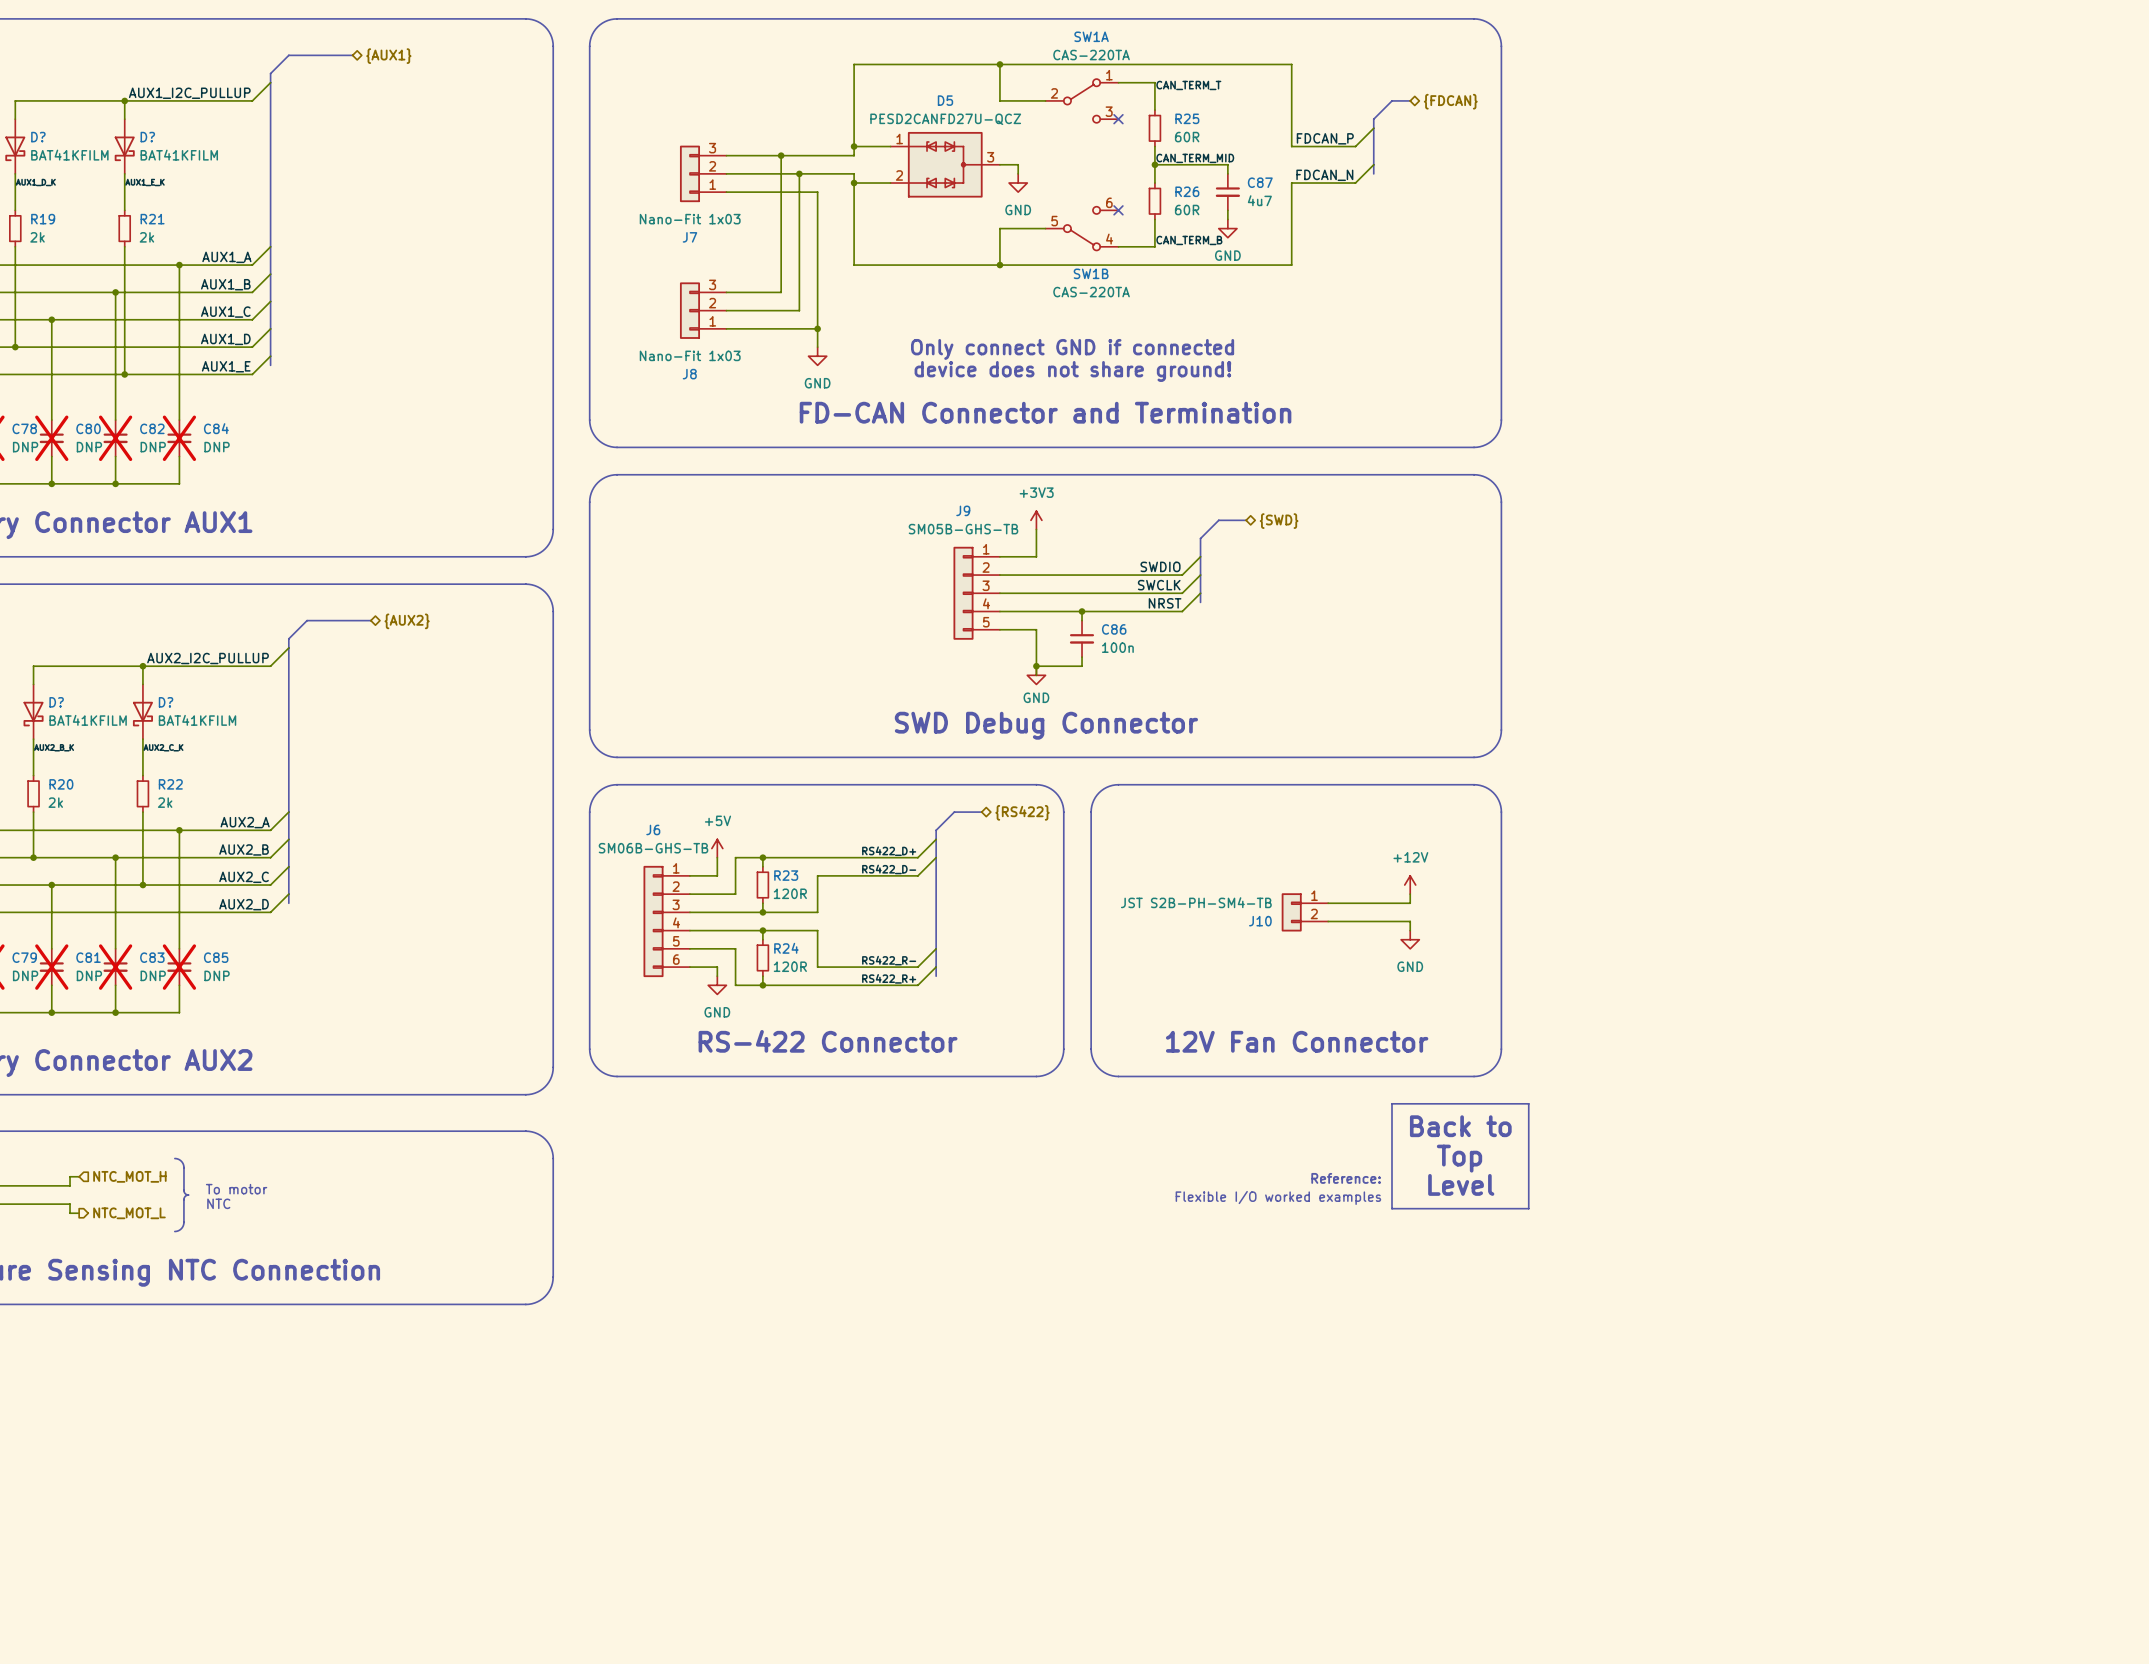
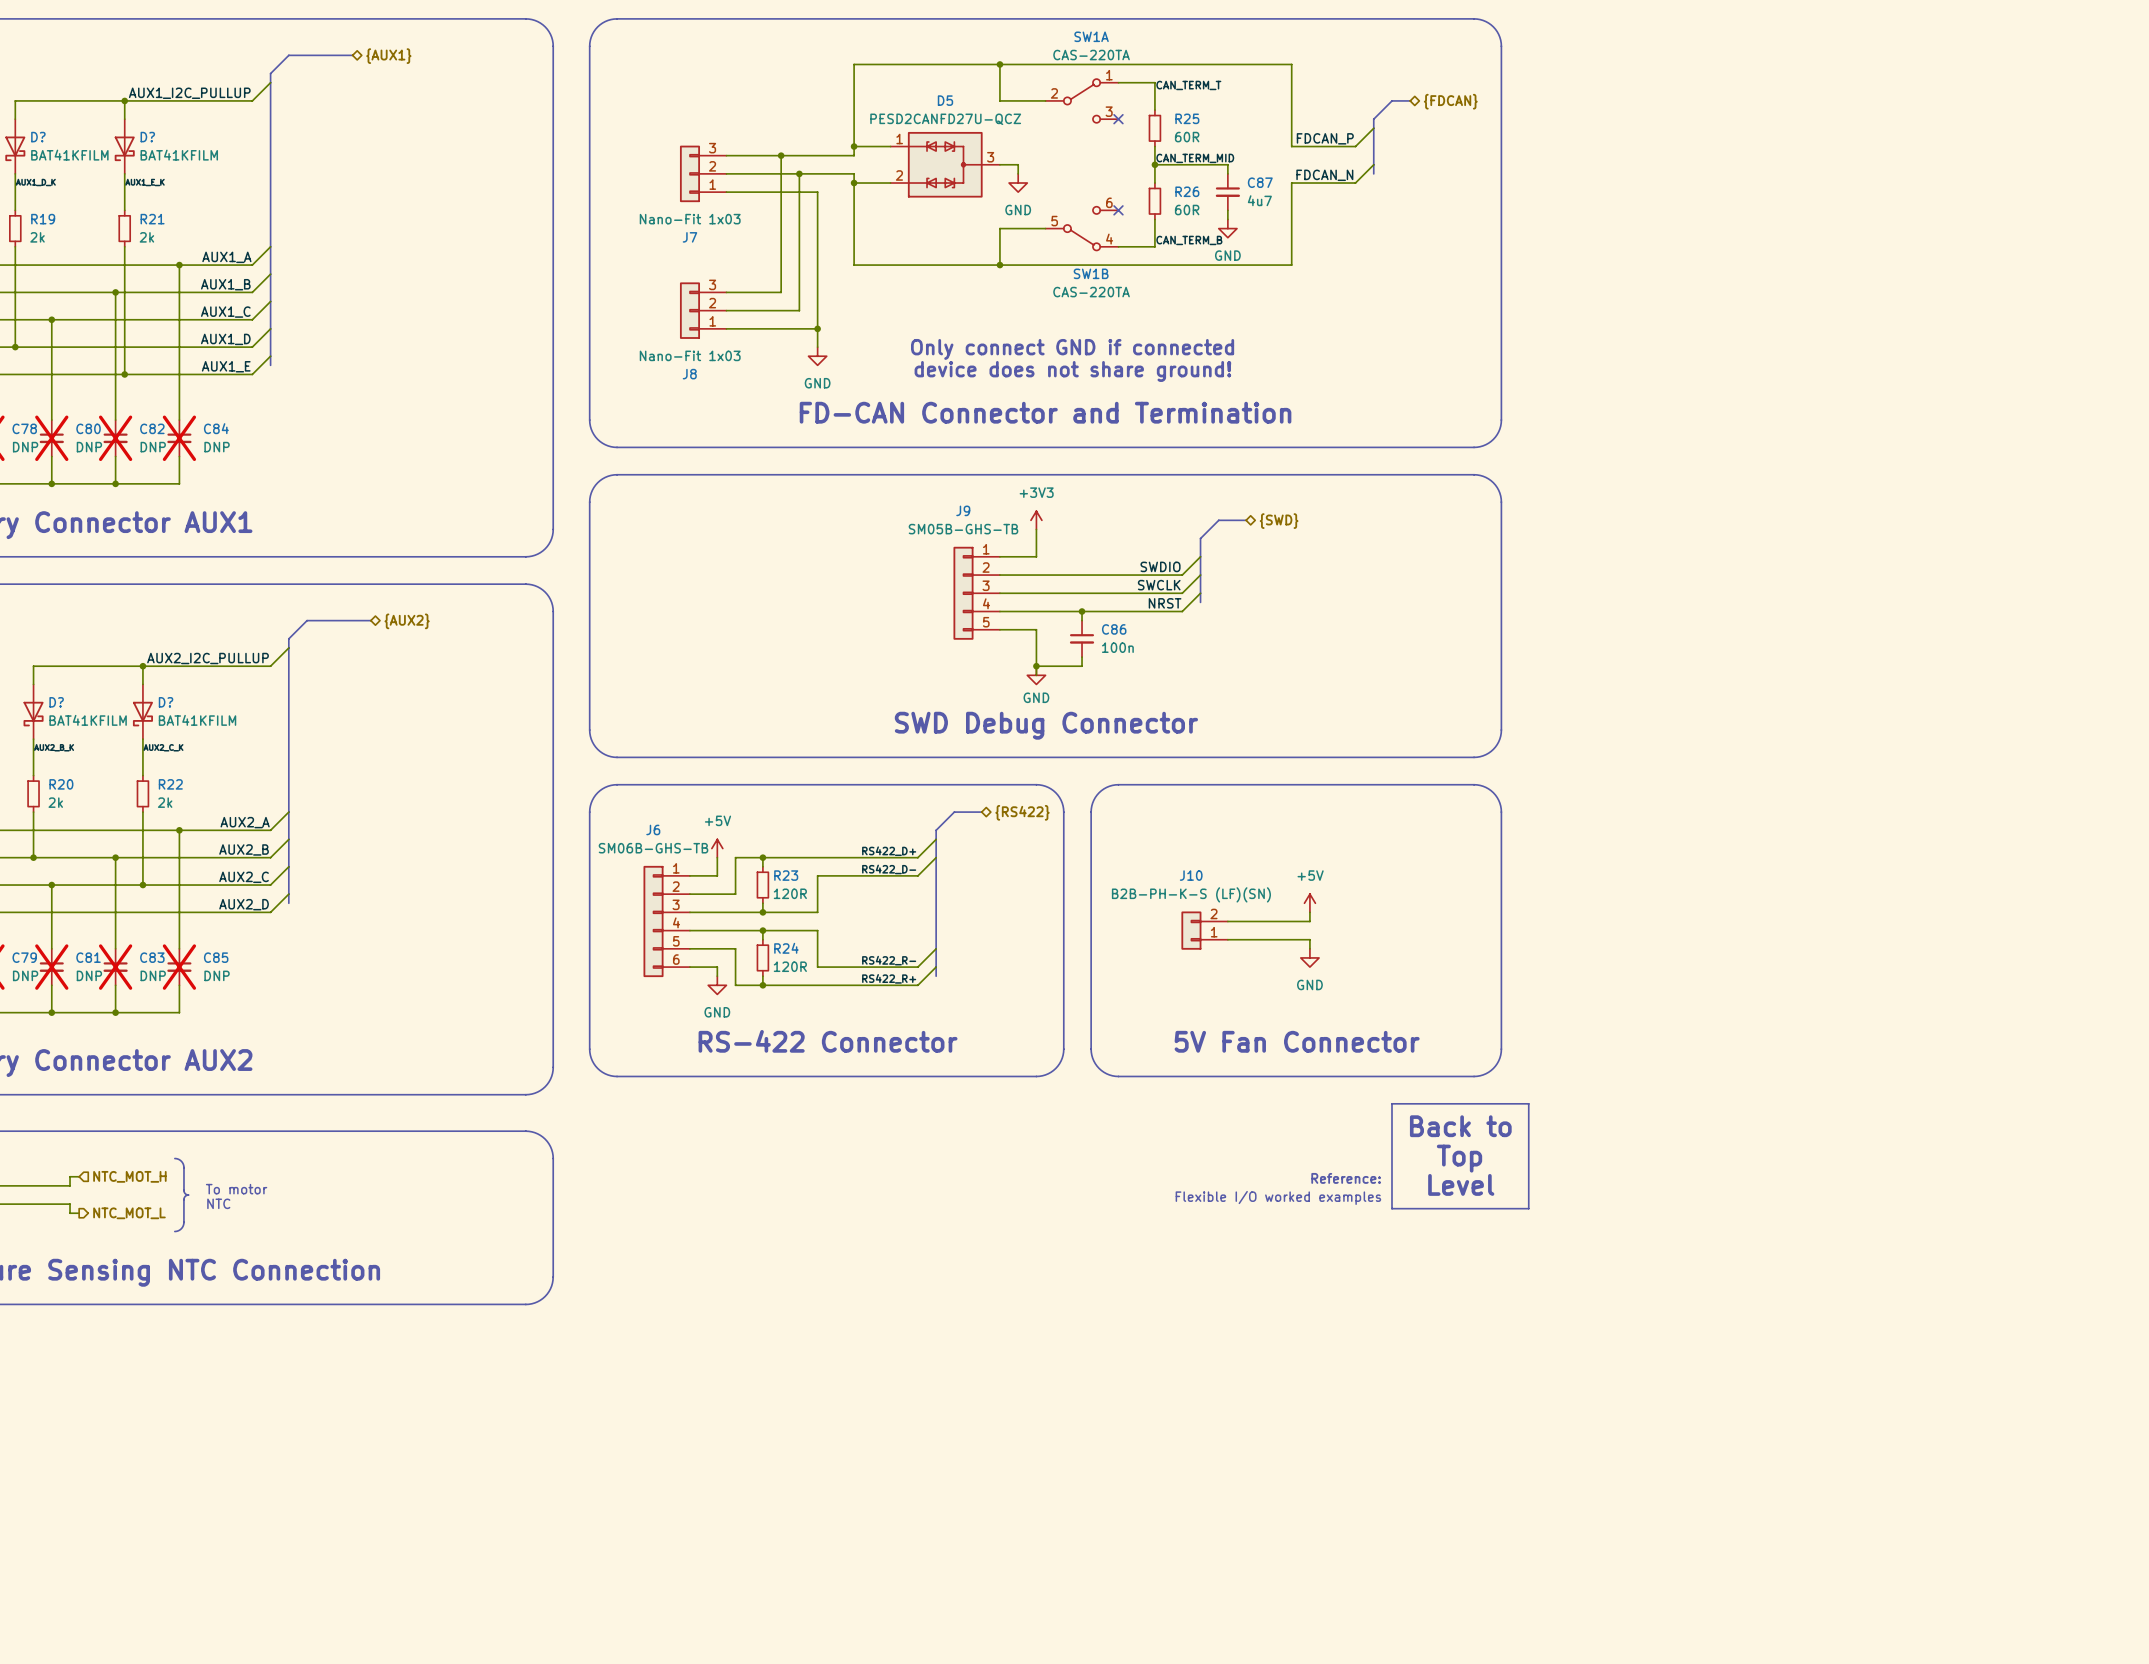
power symbol: +12V (1410, 885) -> none
wire: (1410, 894) (1410, 903) (1328, 903) -> (1309, 912) (1309, 921) (1227, 921)
J10 value: JST S2B-PH-SM4-TB (1196, 902) -> B2B-PH-K-S (LF)(SN) (1191, 894)
power symbol: none -> +5V (1309, 903)
J10 flip: as is (1291, 912) -> up-down (1191, 930)
J10 position: (1304, 912) -> (1204, 930)
J10 name position: J10 (1260, 921) -> J10 (1191, 875)
wire: (1328, 921) (1410, 921) (1410, 930) -> (1227, 939) (1309, 939) (1309, 948)
power symbol position: GND (1410, 939) -> GND (1309, 957)
text: 12V Fan Connector (1297, 1041) -> 5V Fan Connector (1297, 1041)

